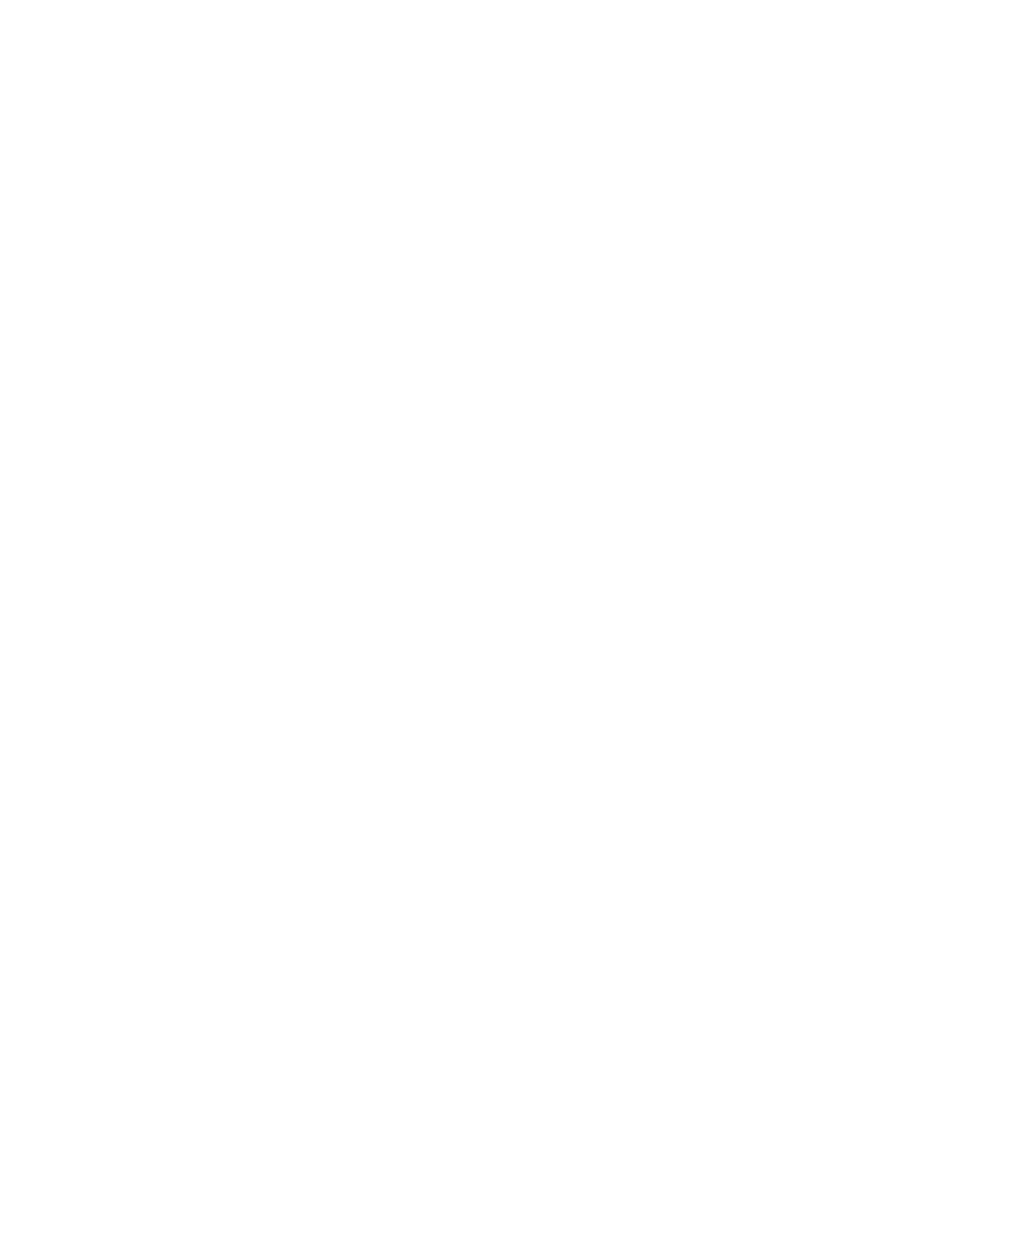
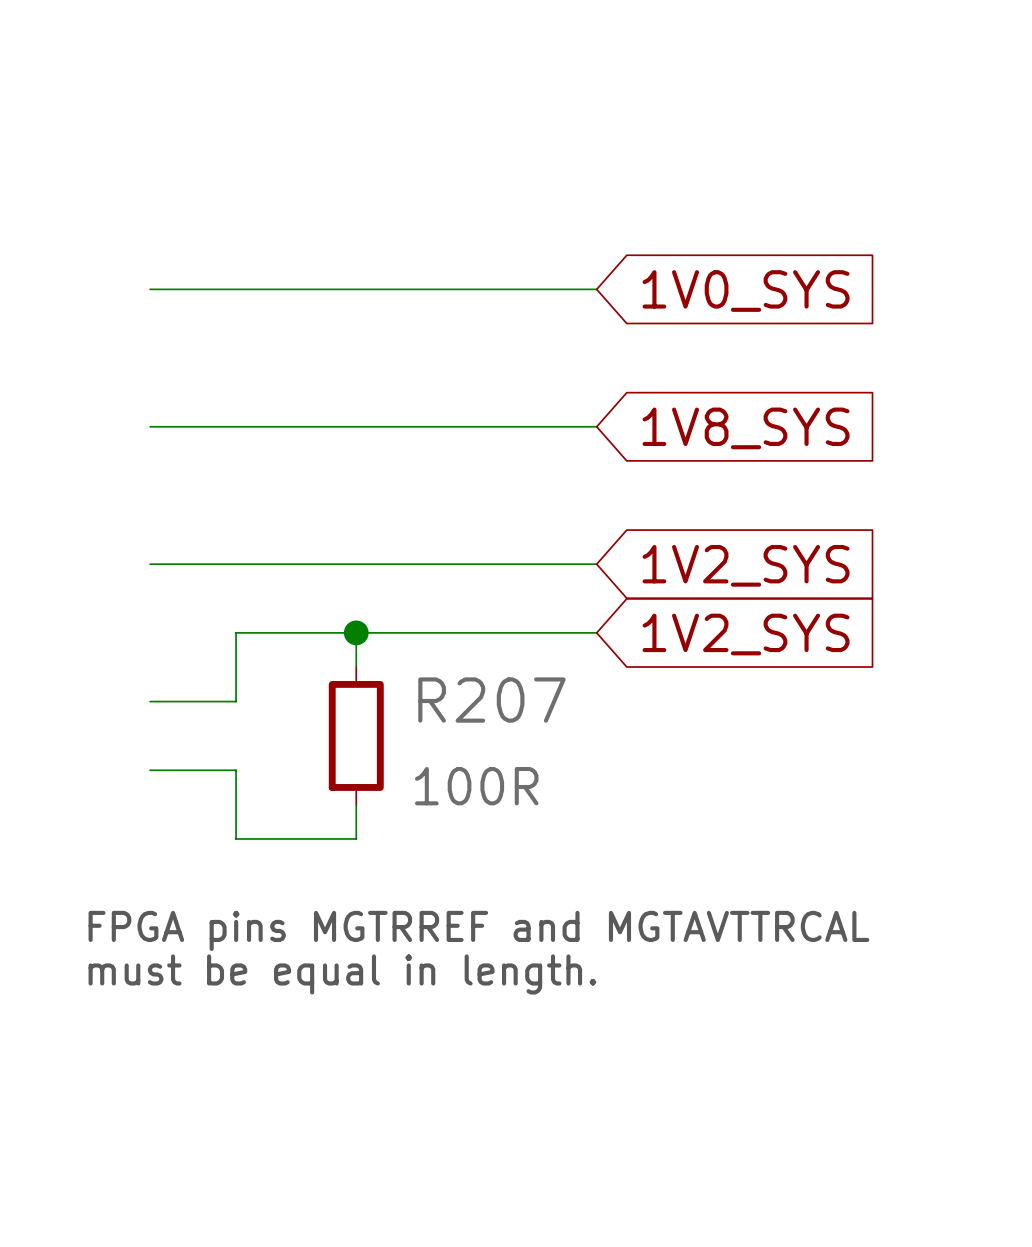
wire: none -> (150, 289) (596, 289)
global label: none -> 1V0_SYS (746, 291)
wire: none -> (150, 426) (596, 426)
global label: none -> 1V8_SYS (746, 428)
wire: none -> (150, 564) (596, 564)
global label: none -> 1V2_SYS (746, 565)
wire: none -> (356, 632) (356, 667)
junction: none -> (356, 632)
wire: none -> (596, 632) (236, 632) (236, 701) (150, 701)
global label: none -> 1V2_SYS (746, 634)
R207: none -> (356, 735)
wire: none -> (150, 770) (236, 770) (236, 838) (356, 838) (356, 804)
text: none -> FPGA pins MGTRREF and MGTAVTTRCAL (478, 930)
text: none -> must be equal in length. (342, 974)

